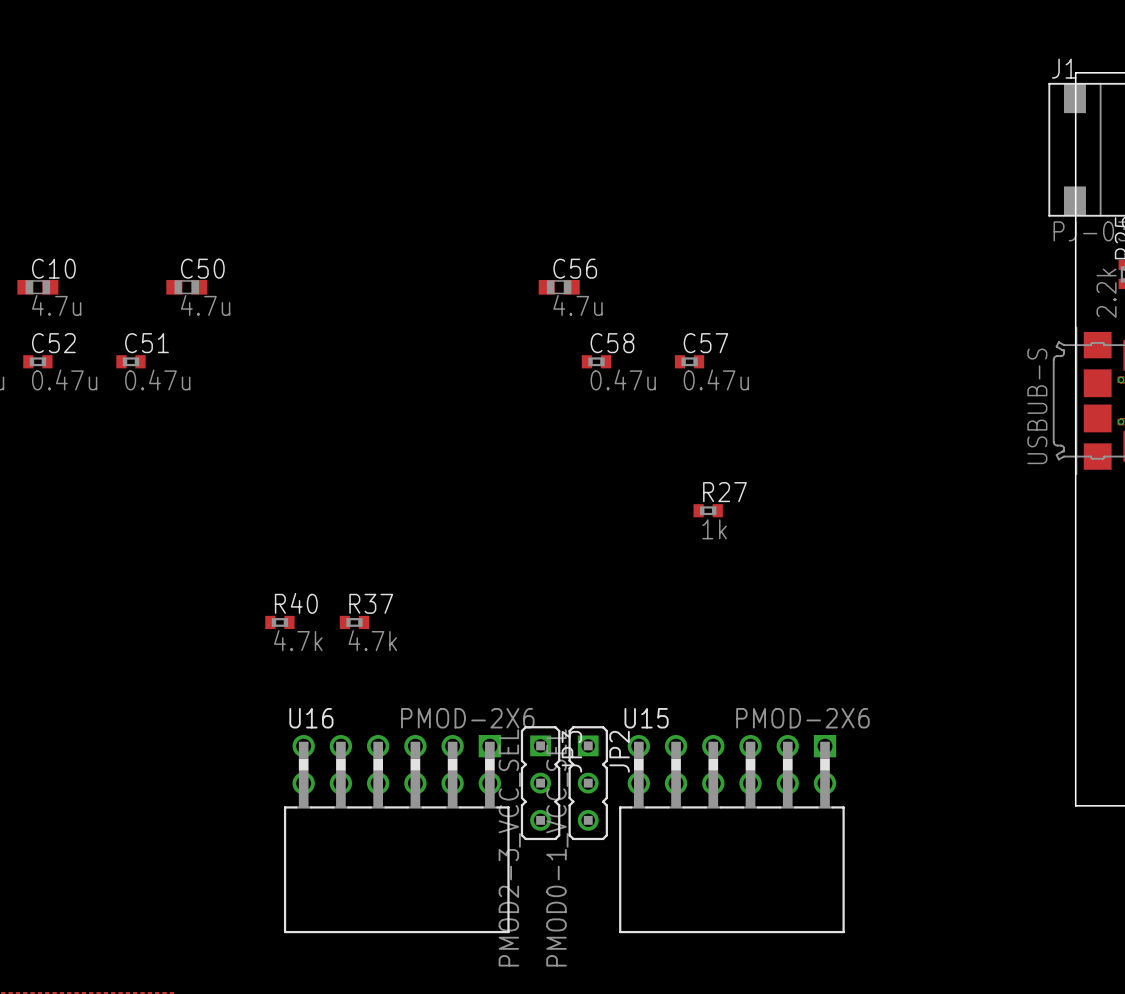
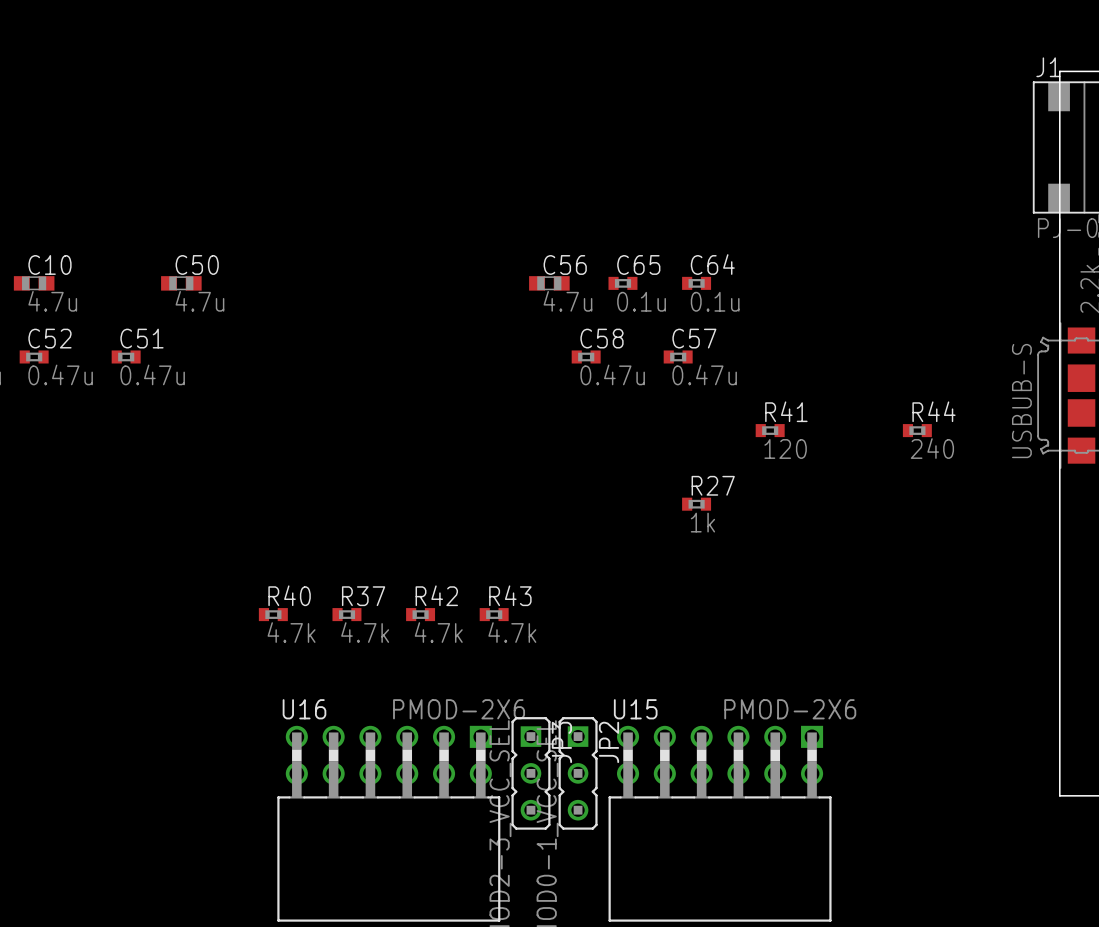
C65: none -> 0.1u (622, 283)
C64: none -> 0.1u (696, 283)
R41: none -> 120 (770, 430)
R44: none -> 240 (917, 430)
R42: none -> 4.7k (420, 614)
R43: none -> 4.7k (494, 614)

